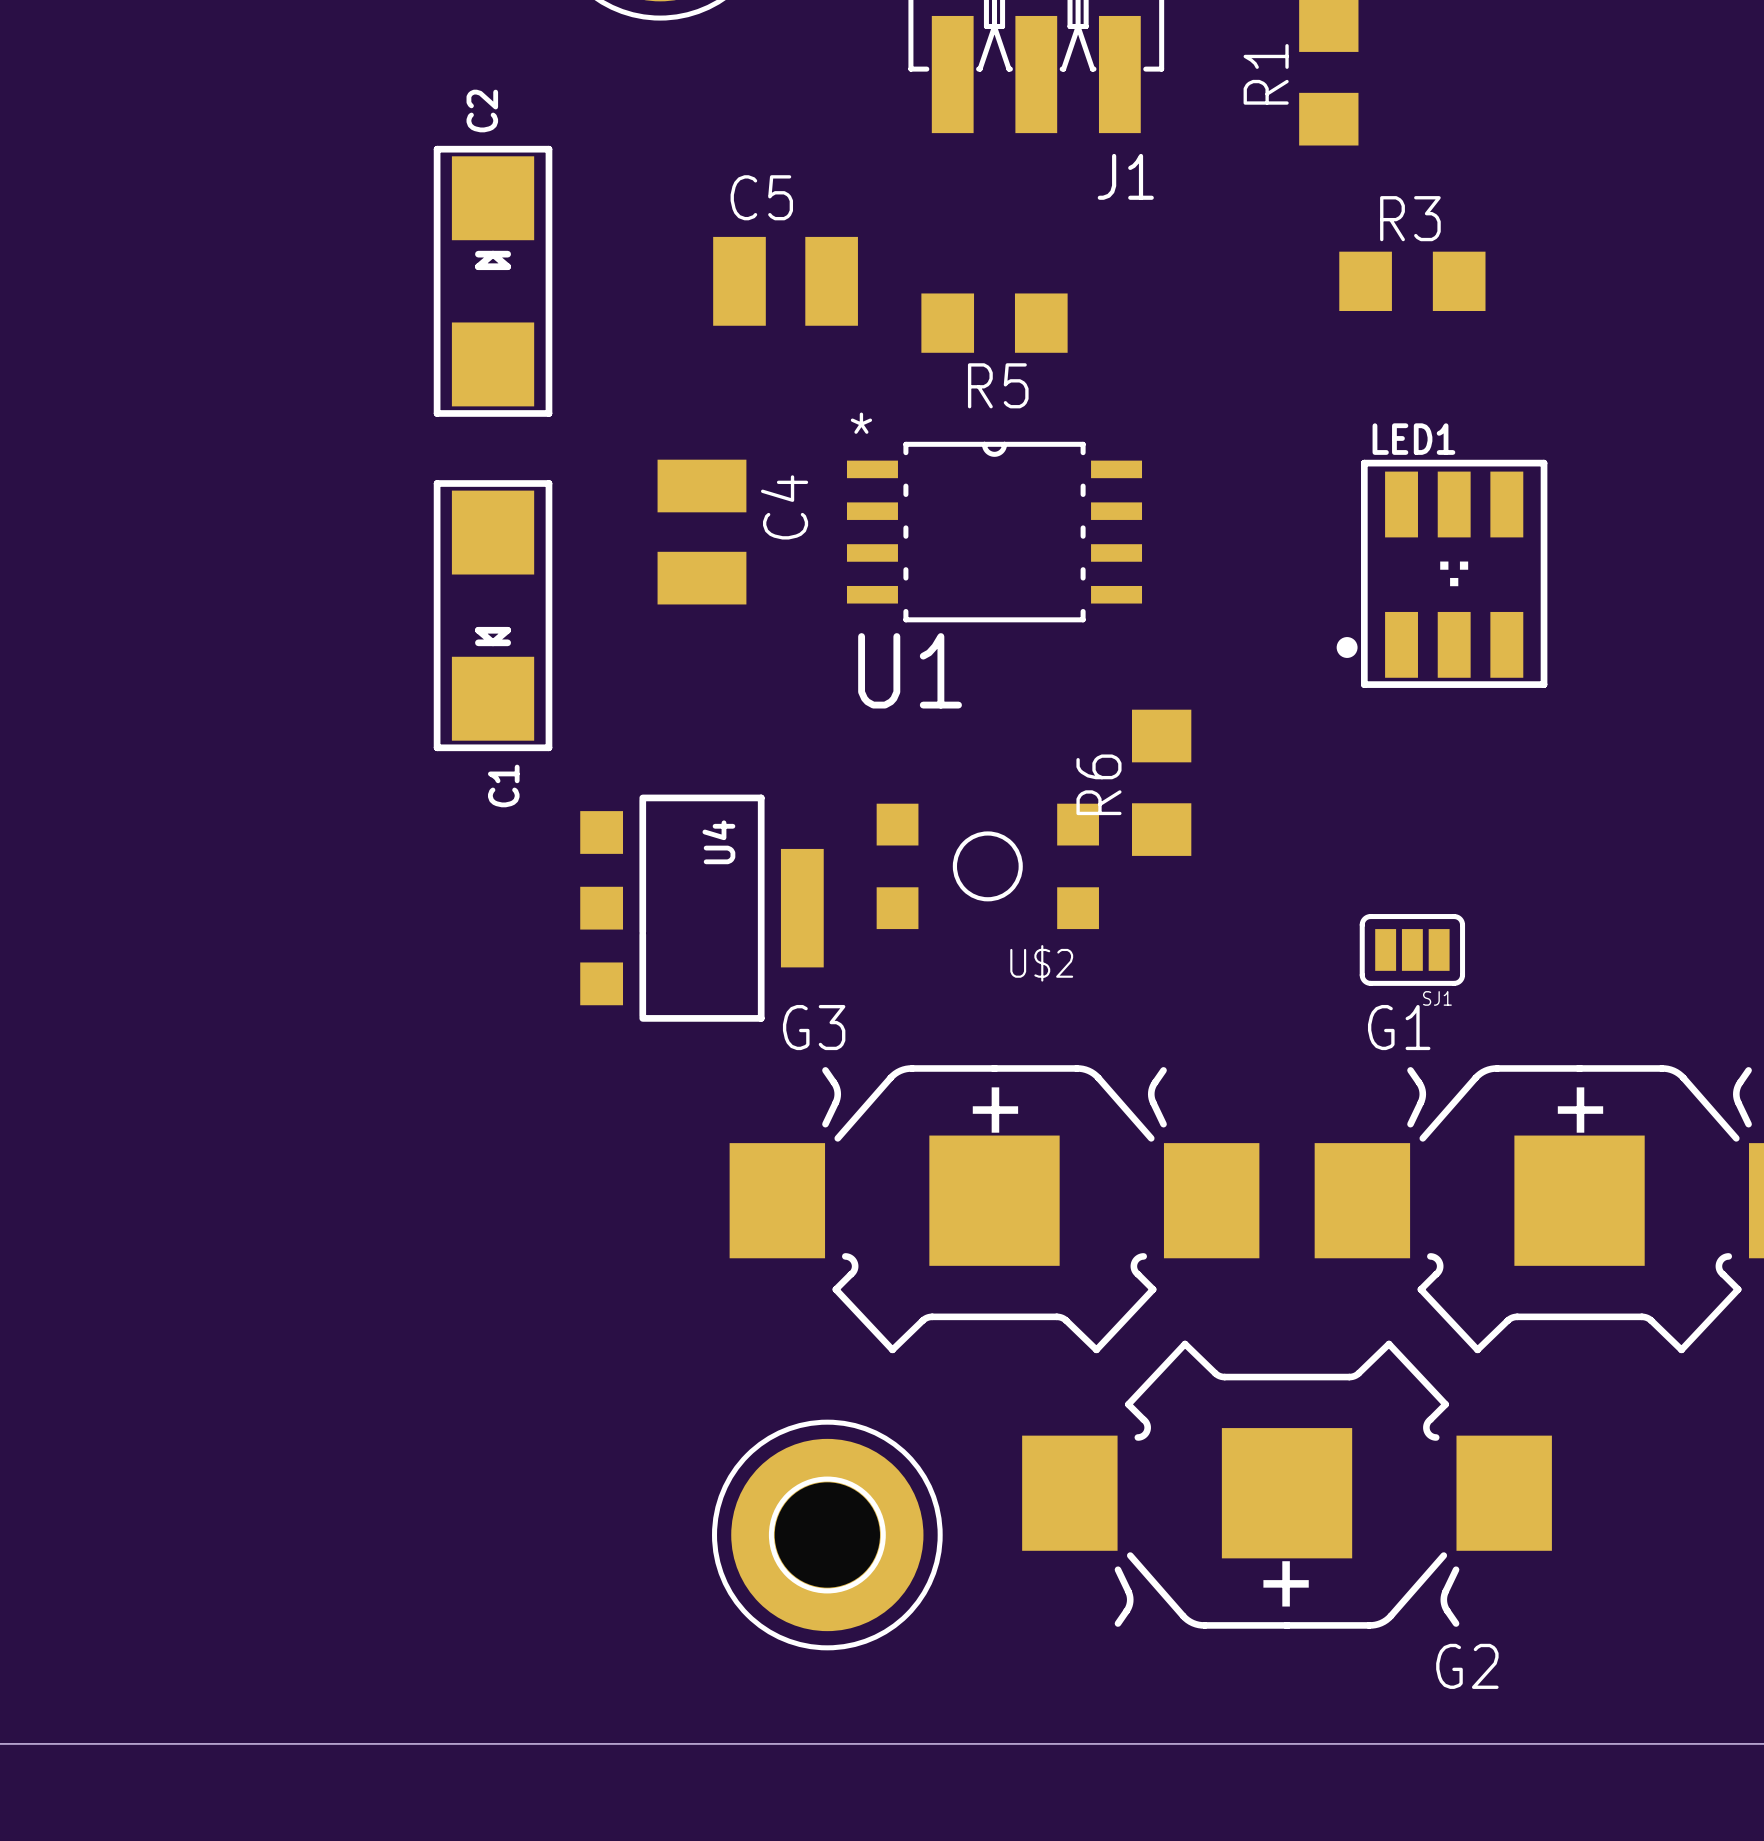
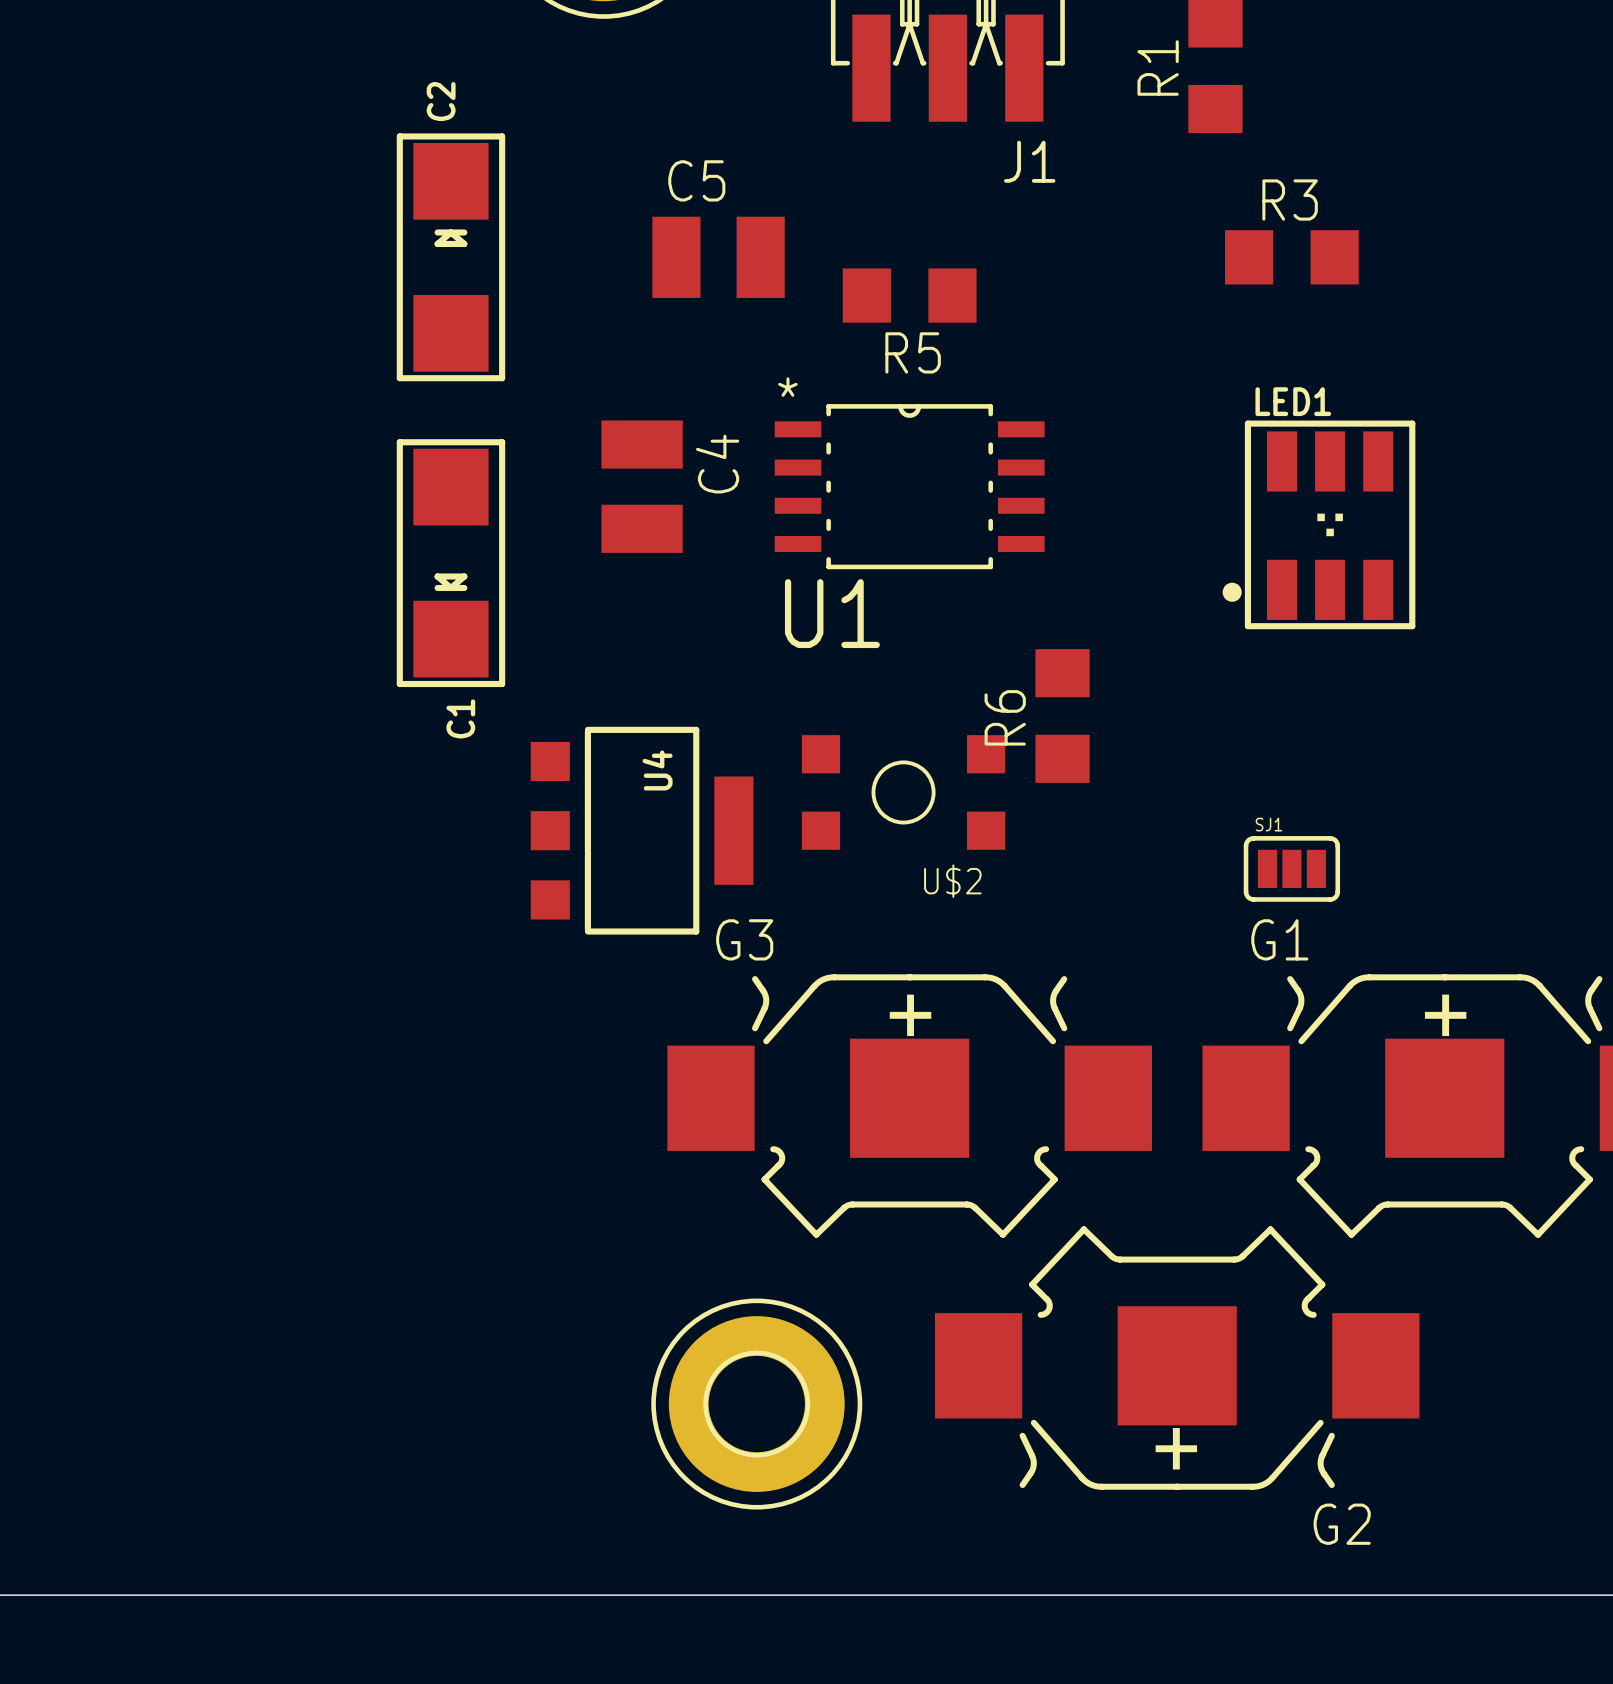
SJ1 name position: SJ1 (1437, 998) -> SJ1 (1268, 824)

